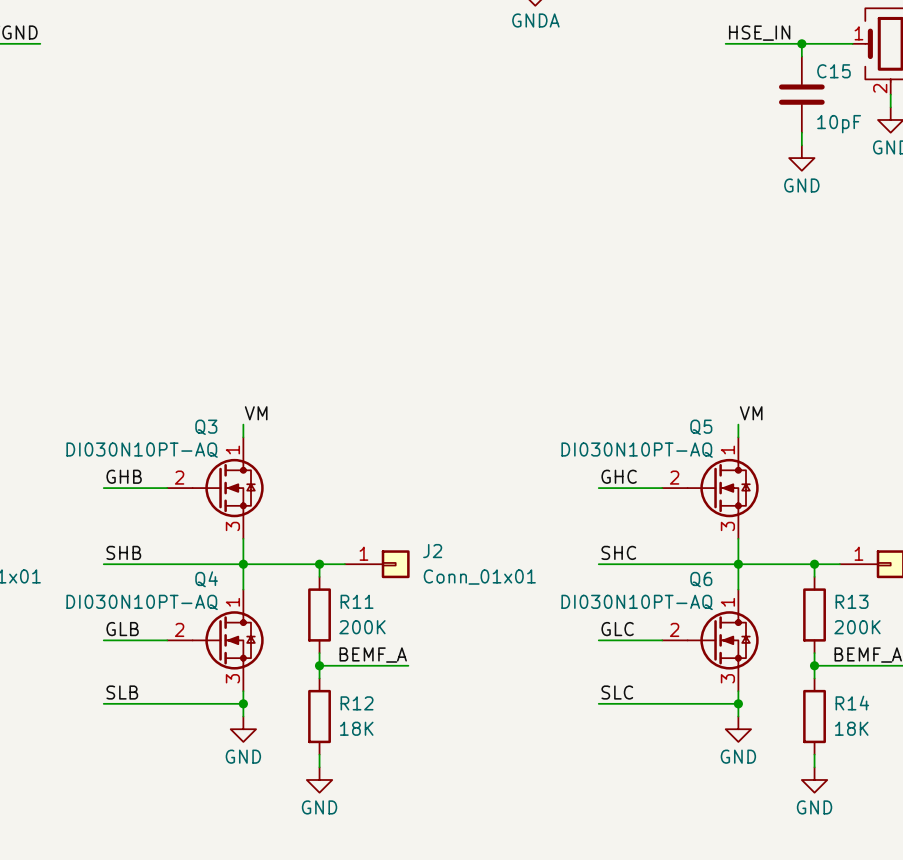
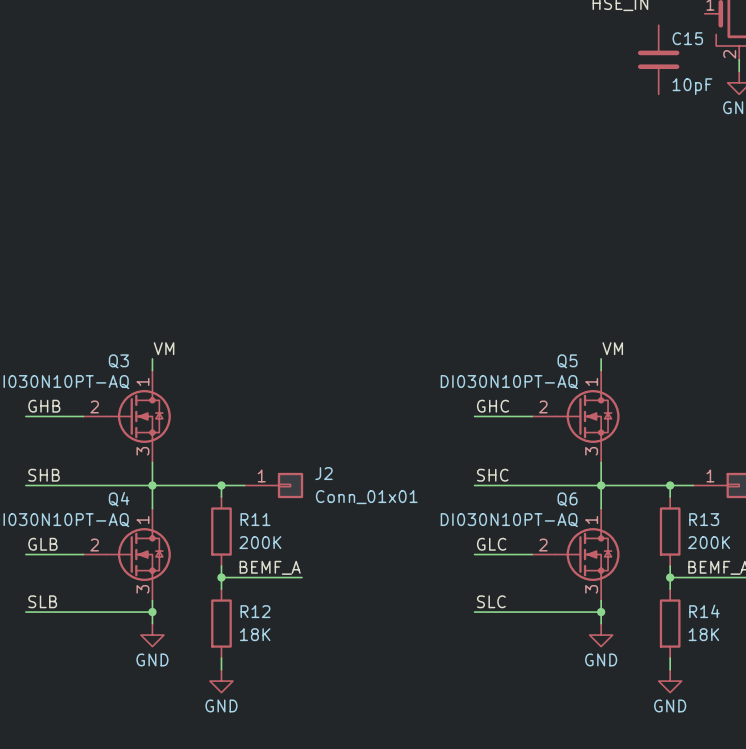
wire: (725, 43) (852, 43) -> none
wire: (801, 43) (801, 56) -> none
junction: (801, 43) -> none
wire: (801, 132) (801, 145) -> none
power symbol: GND (801, 158) -> none

